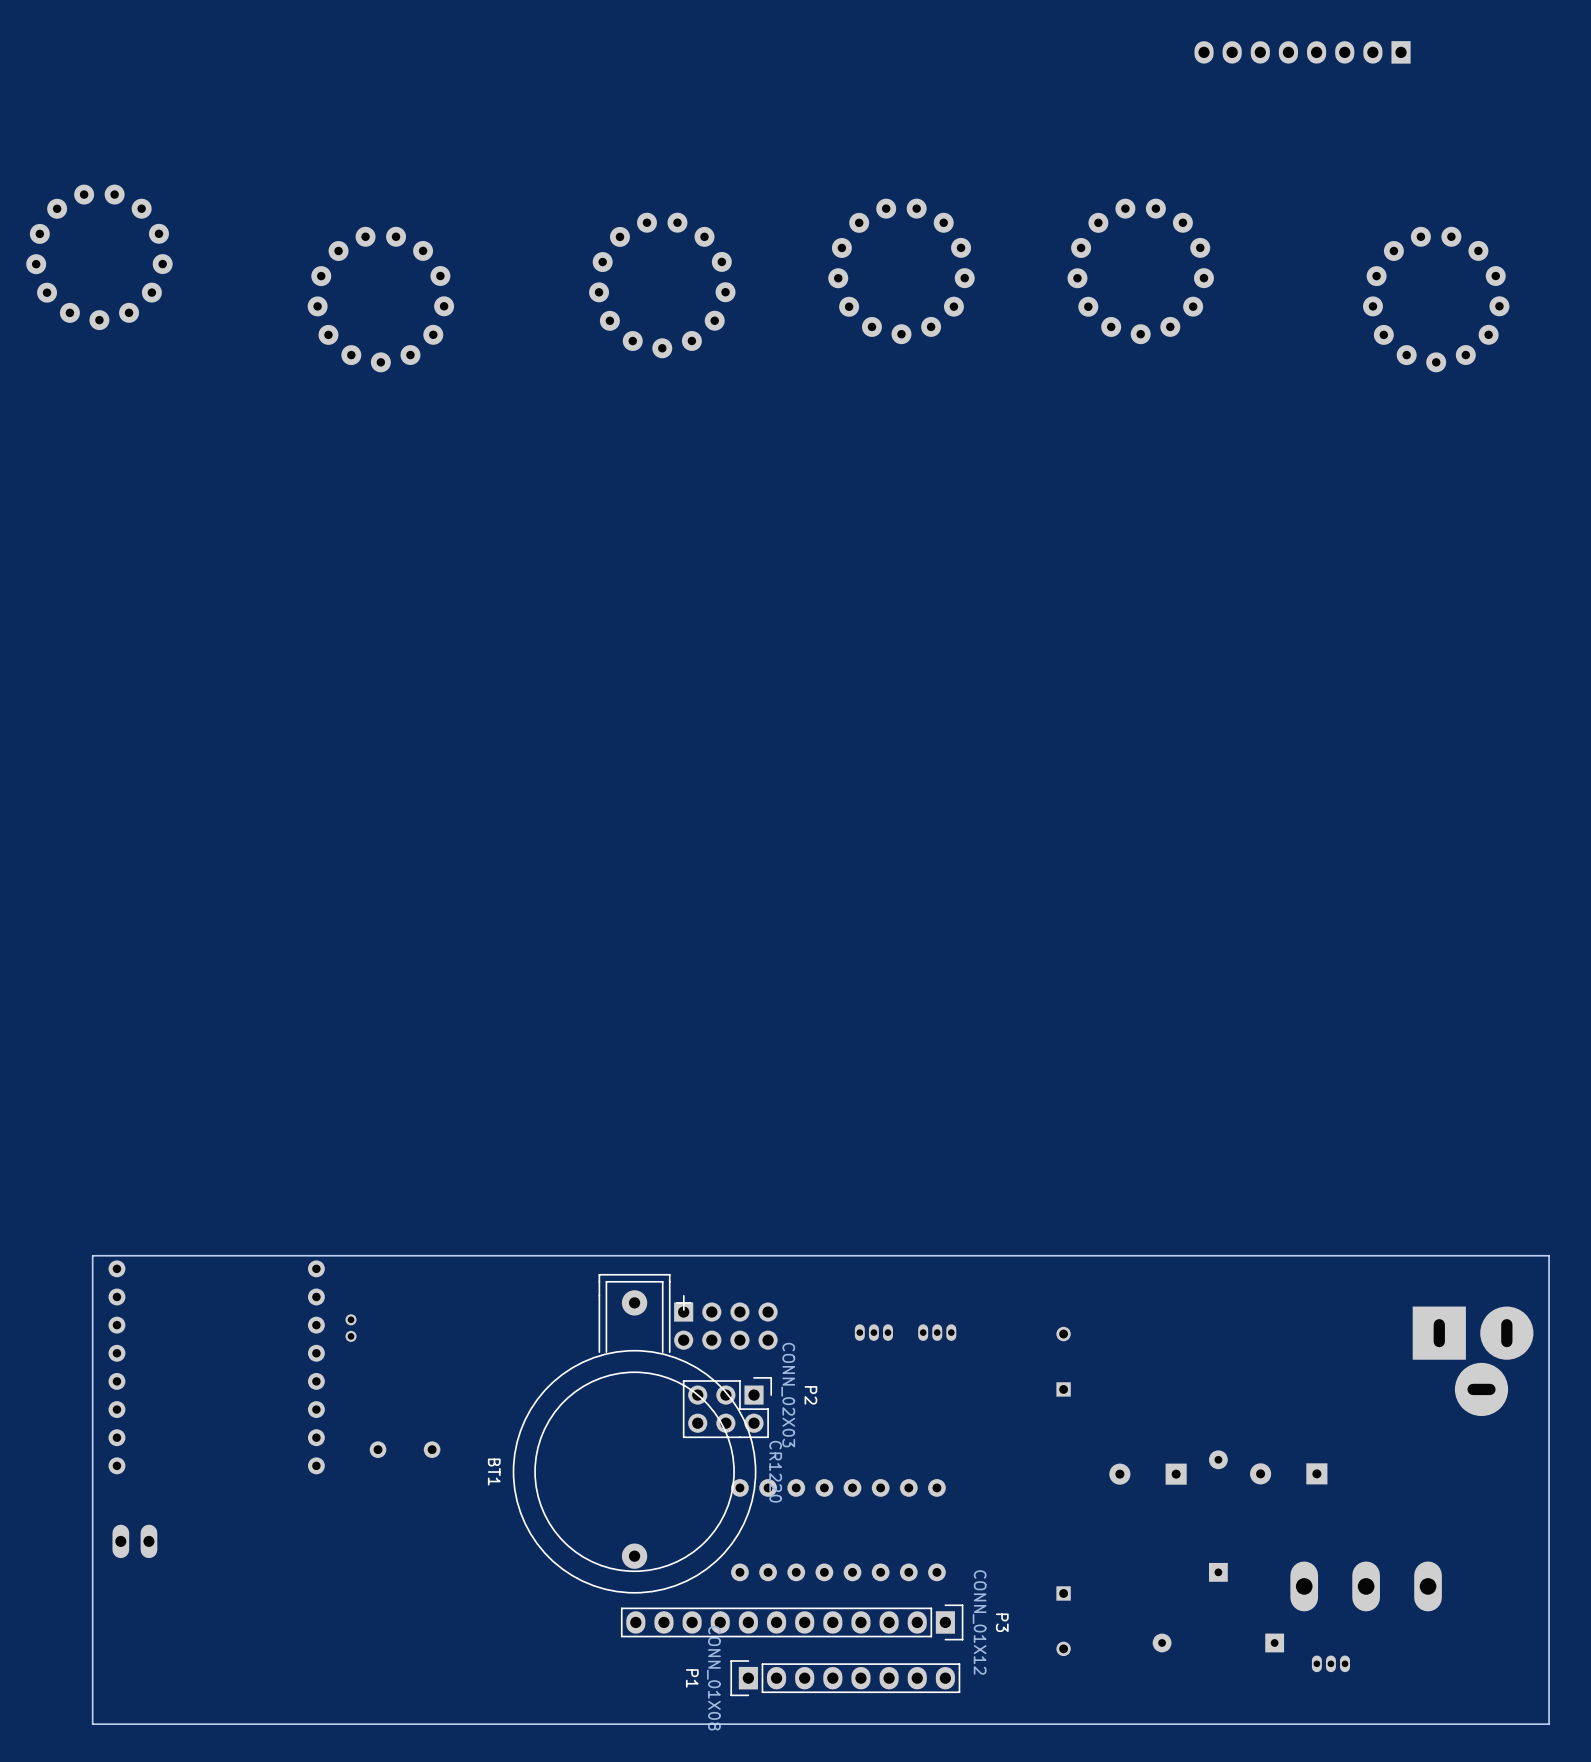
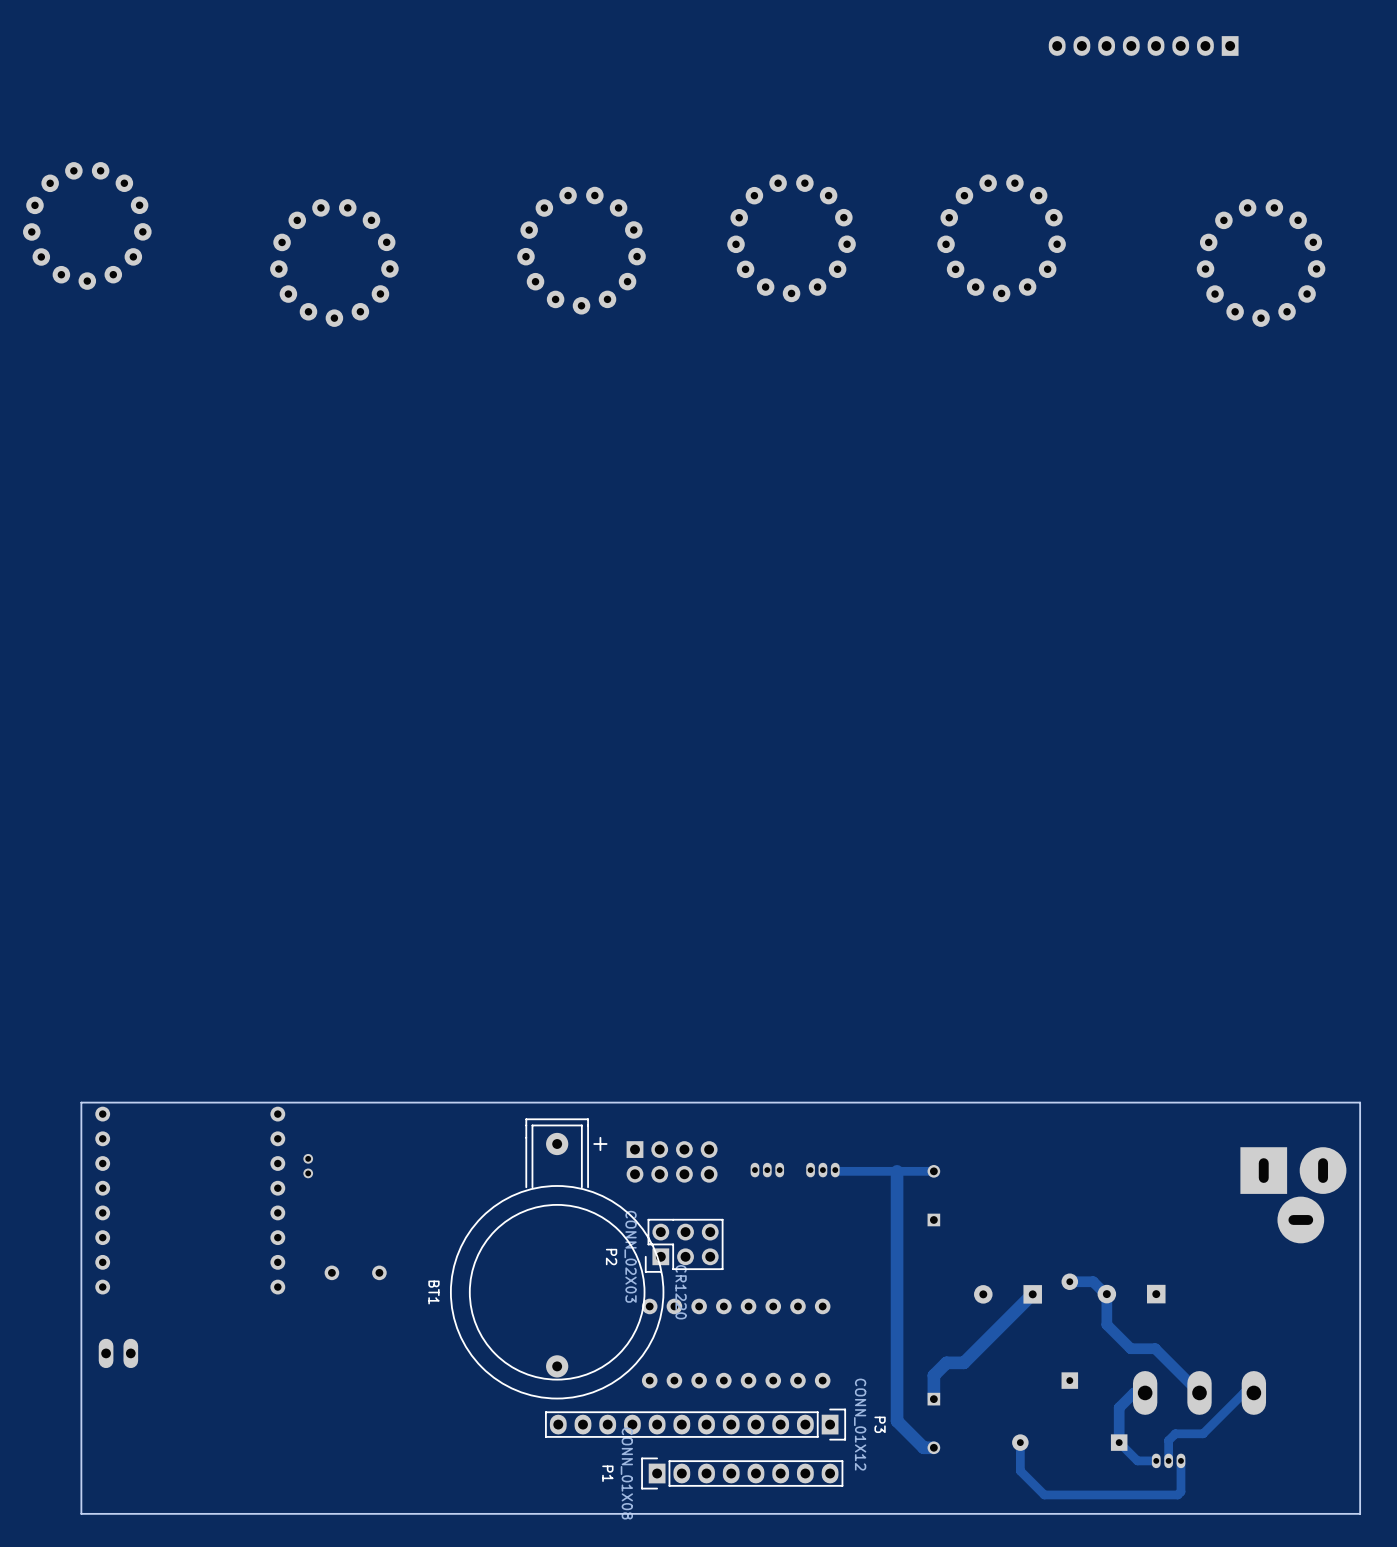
part position: (725, 1326) -> (672, 1161)
track: none -> (835, 1170) (933, 1171)
track: none -> (897, 1171) (897, 1421) (923, 1447) (933, 1447)
P2 rotation: 0° (727, 1407) -> 180° (684, 1245)
track: none -> (1069, 1281) (1093, 1281) (1106, 1294) (1106, 1324) (1130, 1348) (1155, 1348) (1199, 1392)
track: none -> (1032, 1294) (963, 1362) (946, 1362) (933, 1375) (933, 1399)
track: none -> (1145, 1392) (1134, 1392) (1119, 1407) (1119, 1442) (1137, 1460) (1156, 1460)
track: none -> (1253, 1392) (1243, 1392) (1203, 1433) (1175, 1433) (1168, 1440) (1168, 1460)
track: none -> (1020, 1442) (1020, 1470) (1044, 1494) (1177, 1494) (1180, 1491) (1180, 1460)

